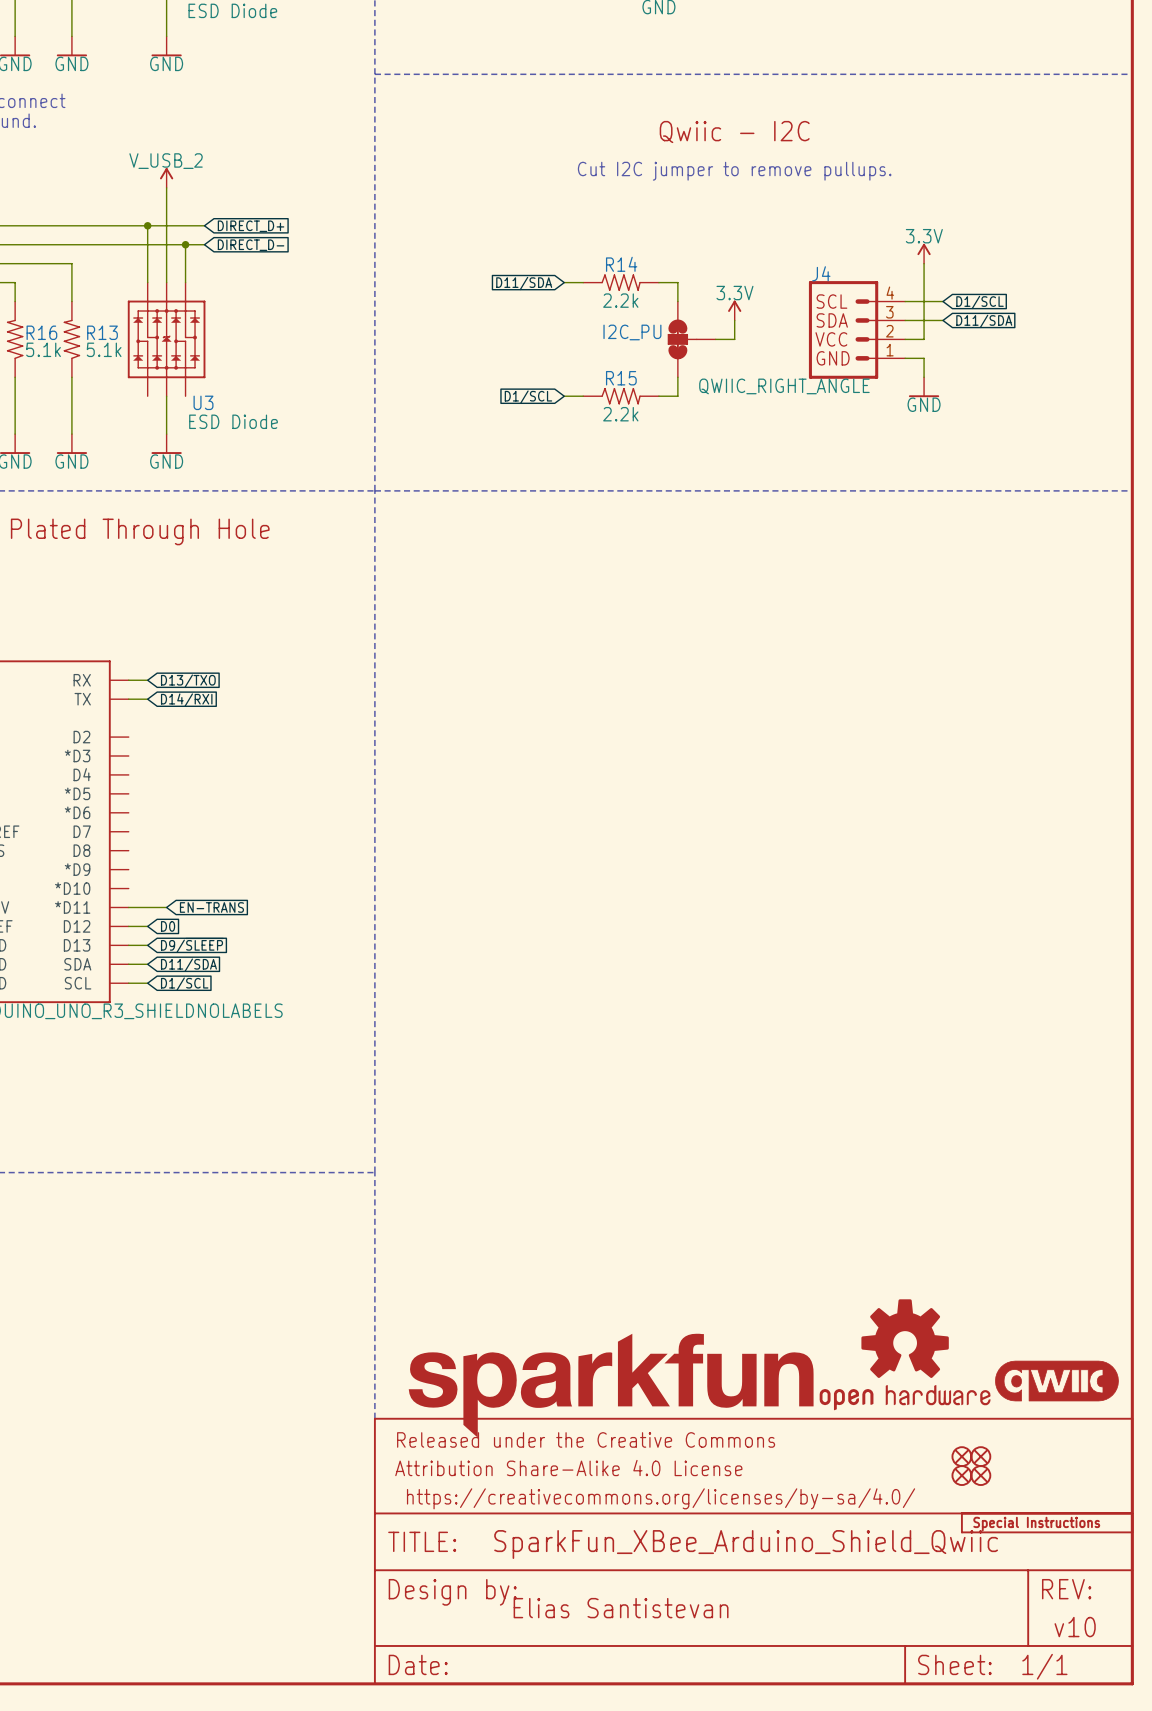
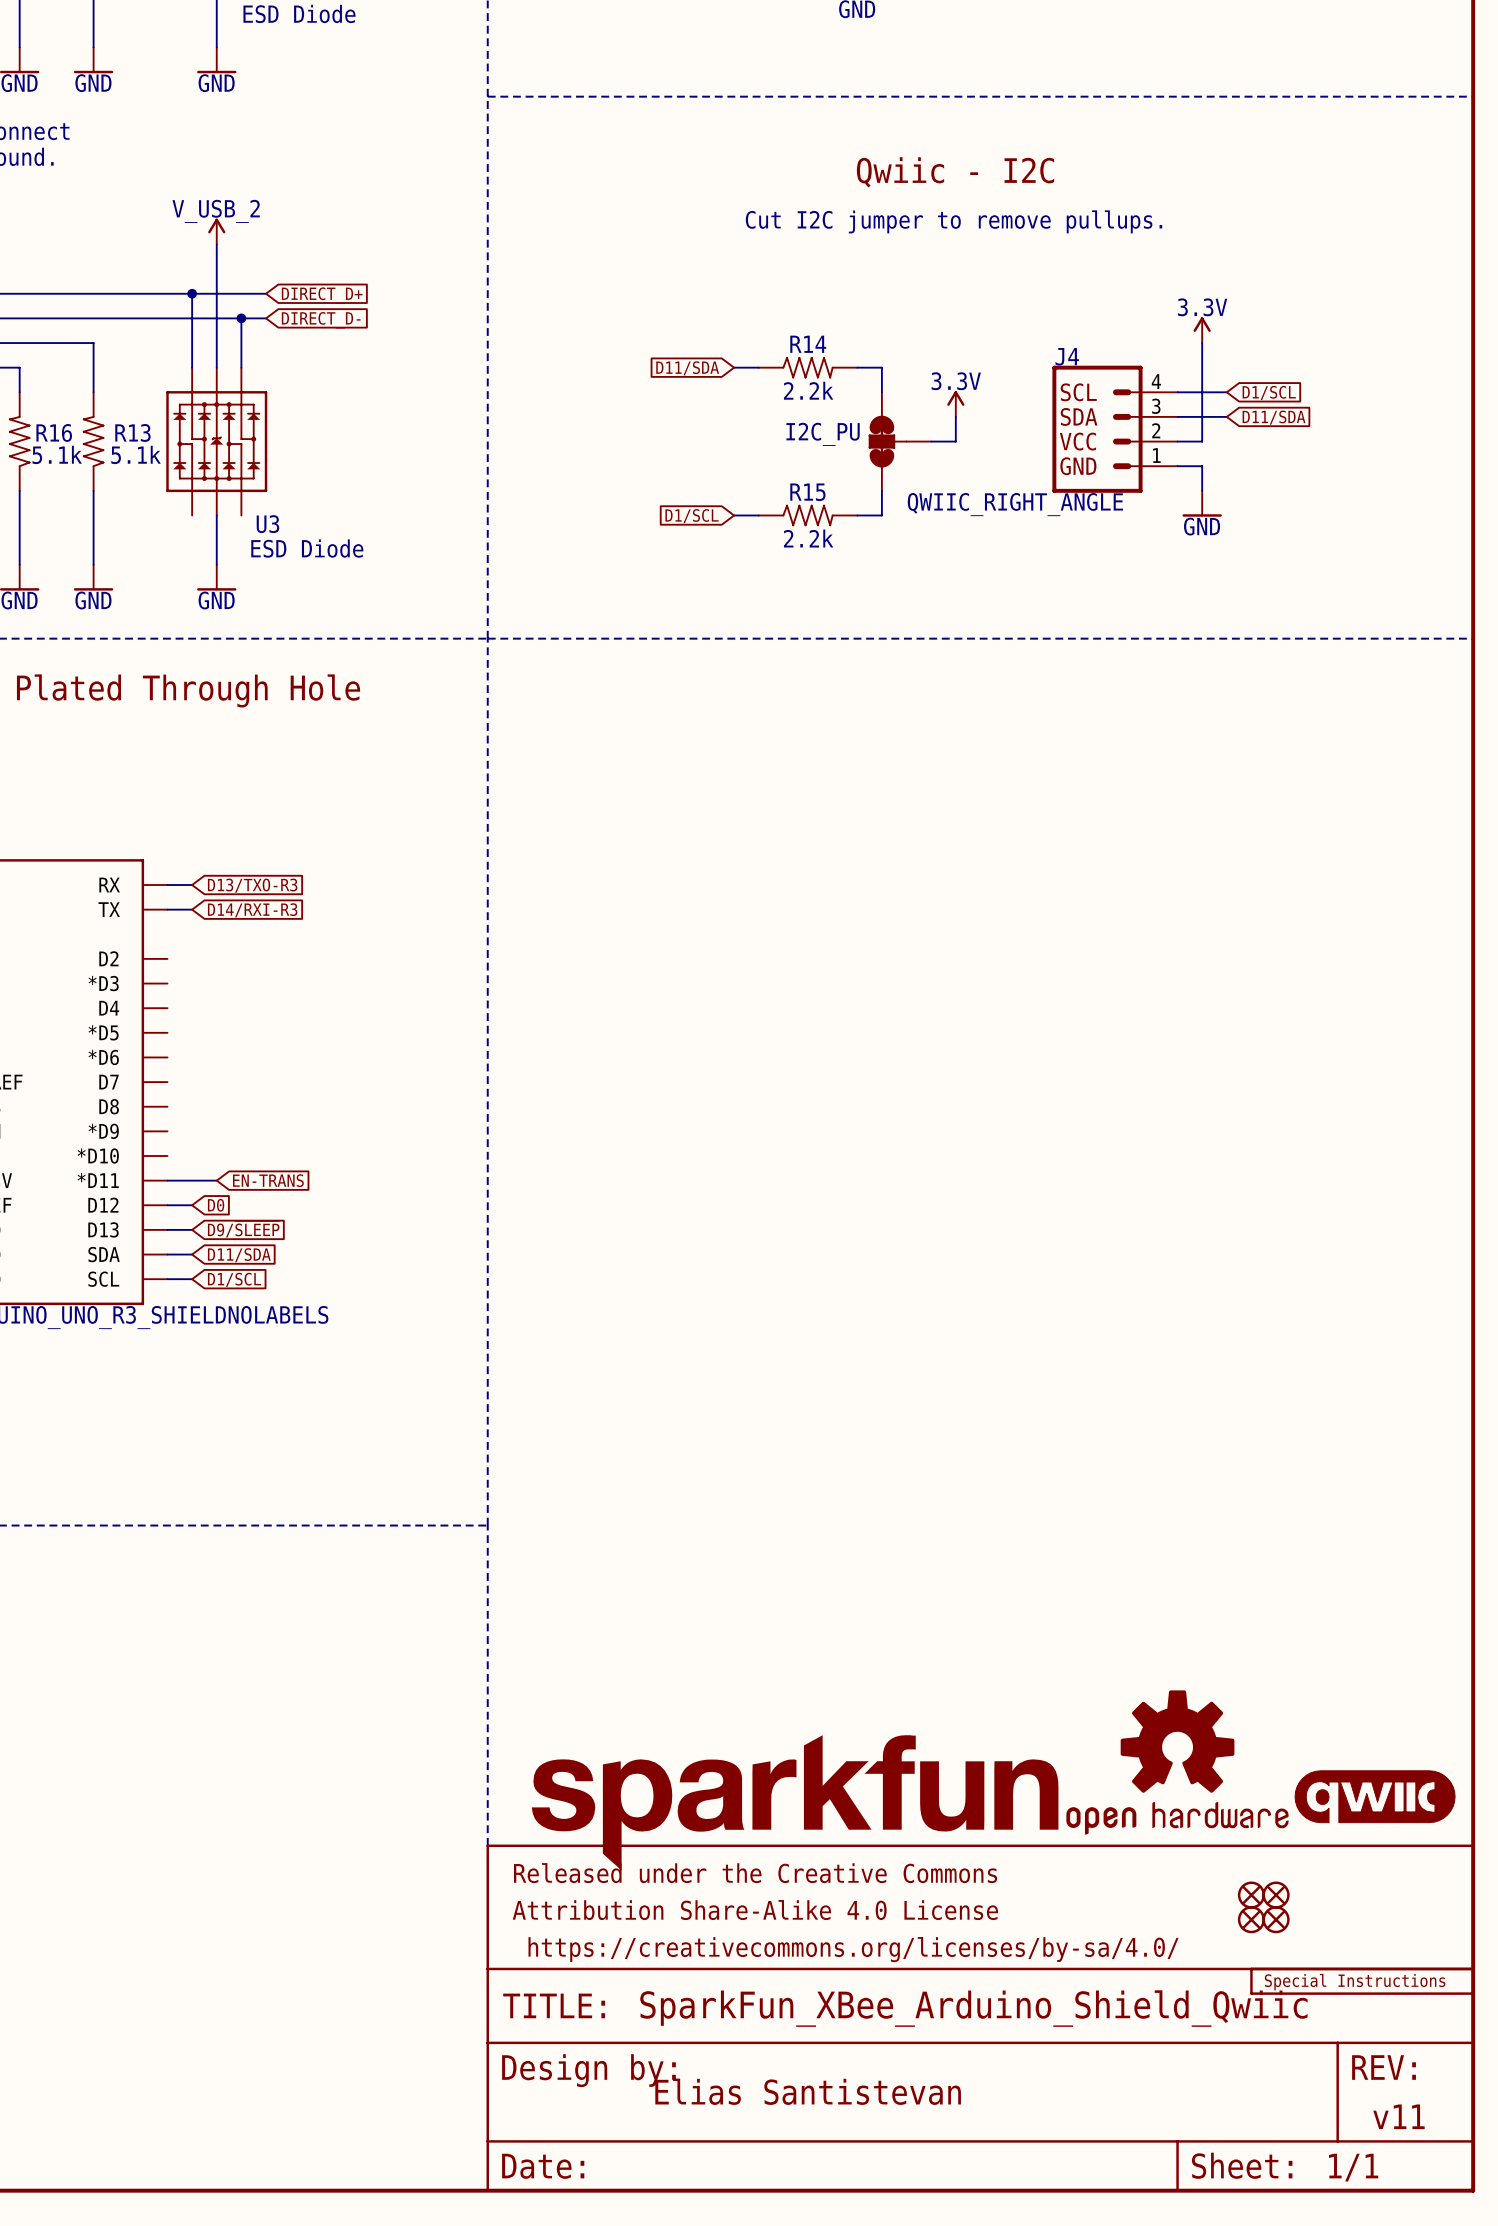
global label: D13/TXO (188, 681) -> D13/TXO-R3 (252, 885)
global label: D14/RXI (186, 700) -> D14/RXI-R3 (252, 910)
text: v10 (1075, 1627) -> v11 (1398, 2116)

